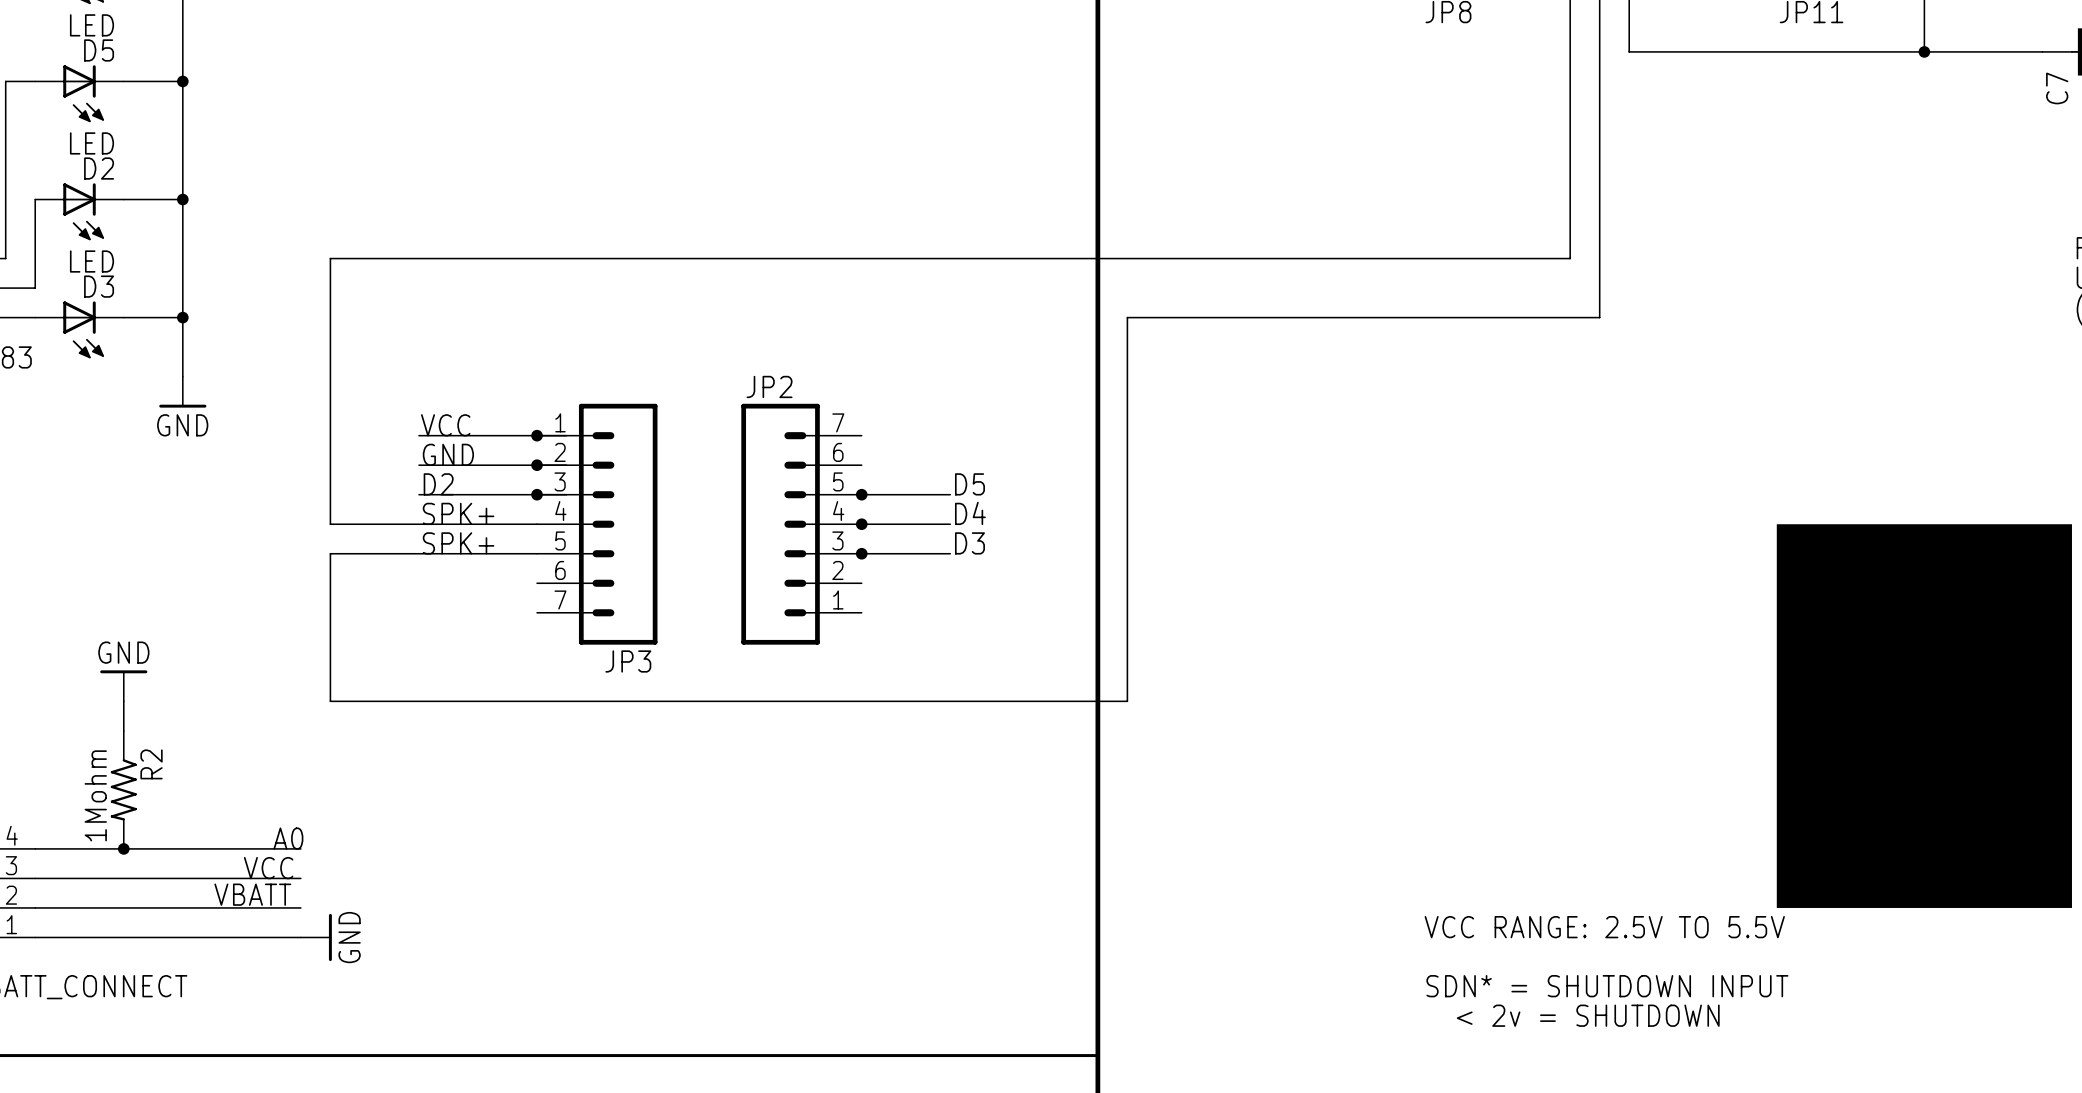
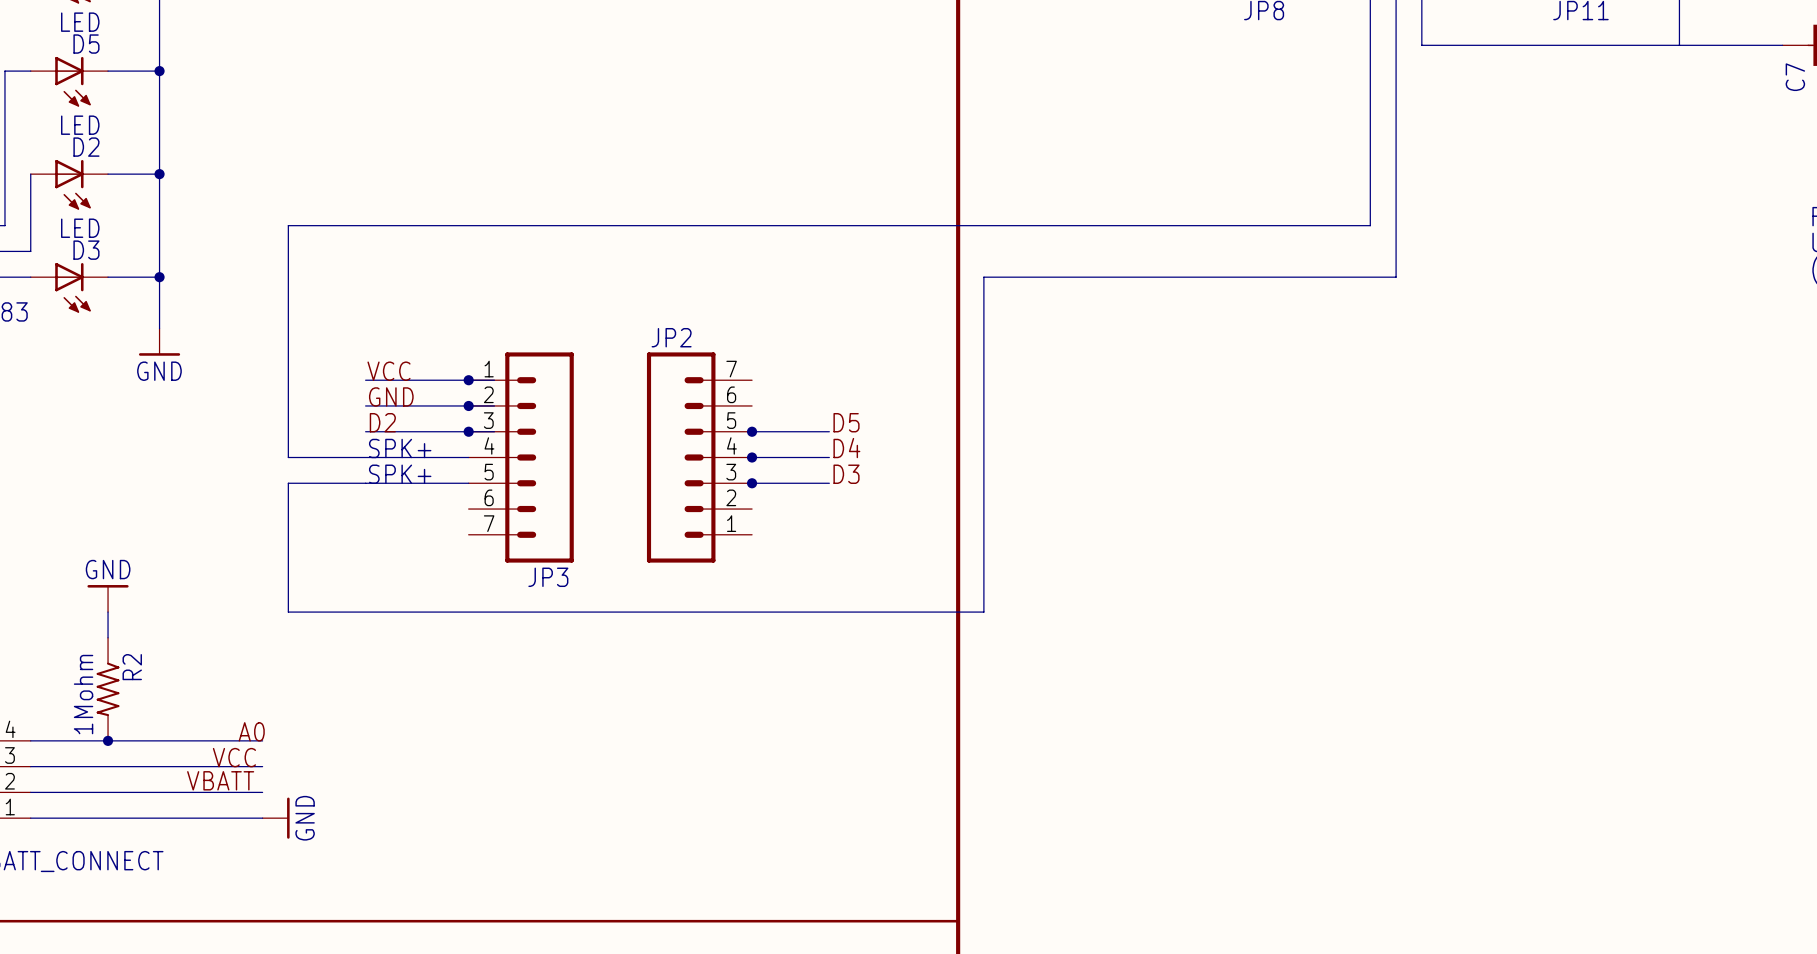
junction: (1924, 51) -> none
drawing: [1776, 524, 2072, 908] -> none
text: VCC RANGE: 2.5V TO 5.5V (1604, 927) -> none
text: SDN* = SHUTDOWN INPUT (1607, 986) -> none
text: < 2v = SHUTDOWN (1588, 1015) -> none

